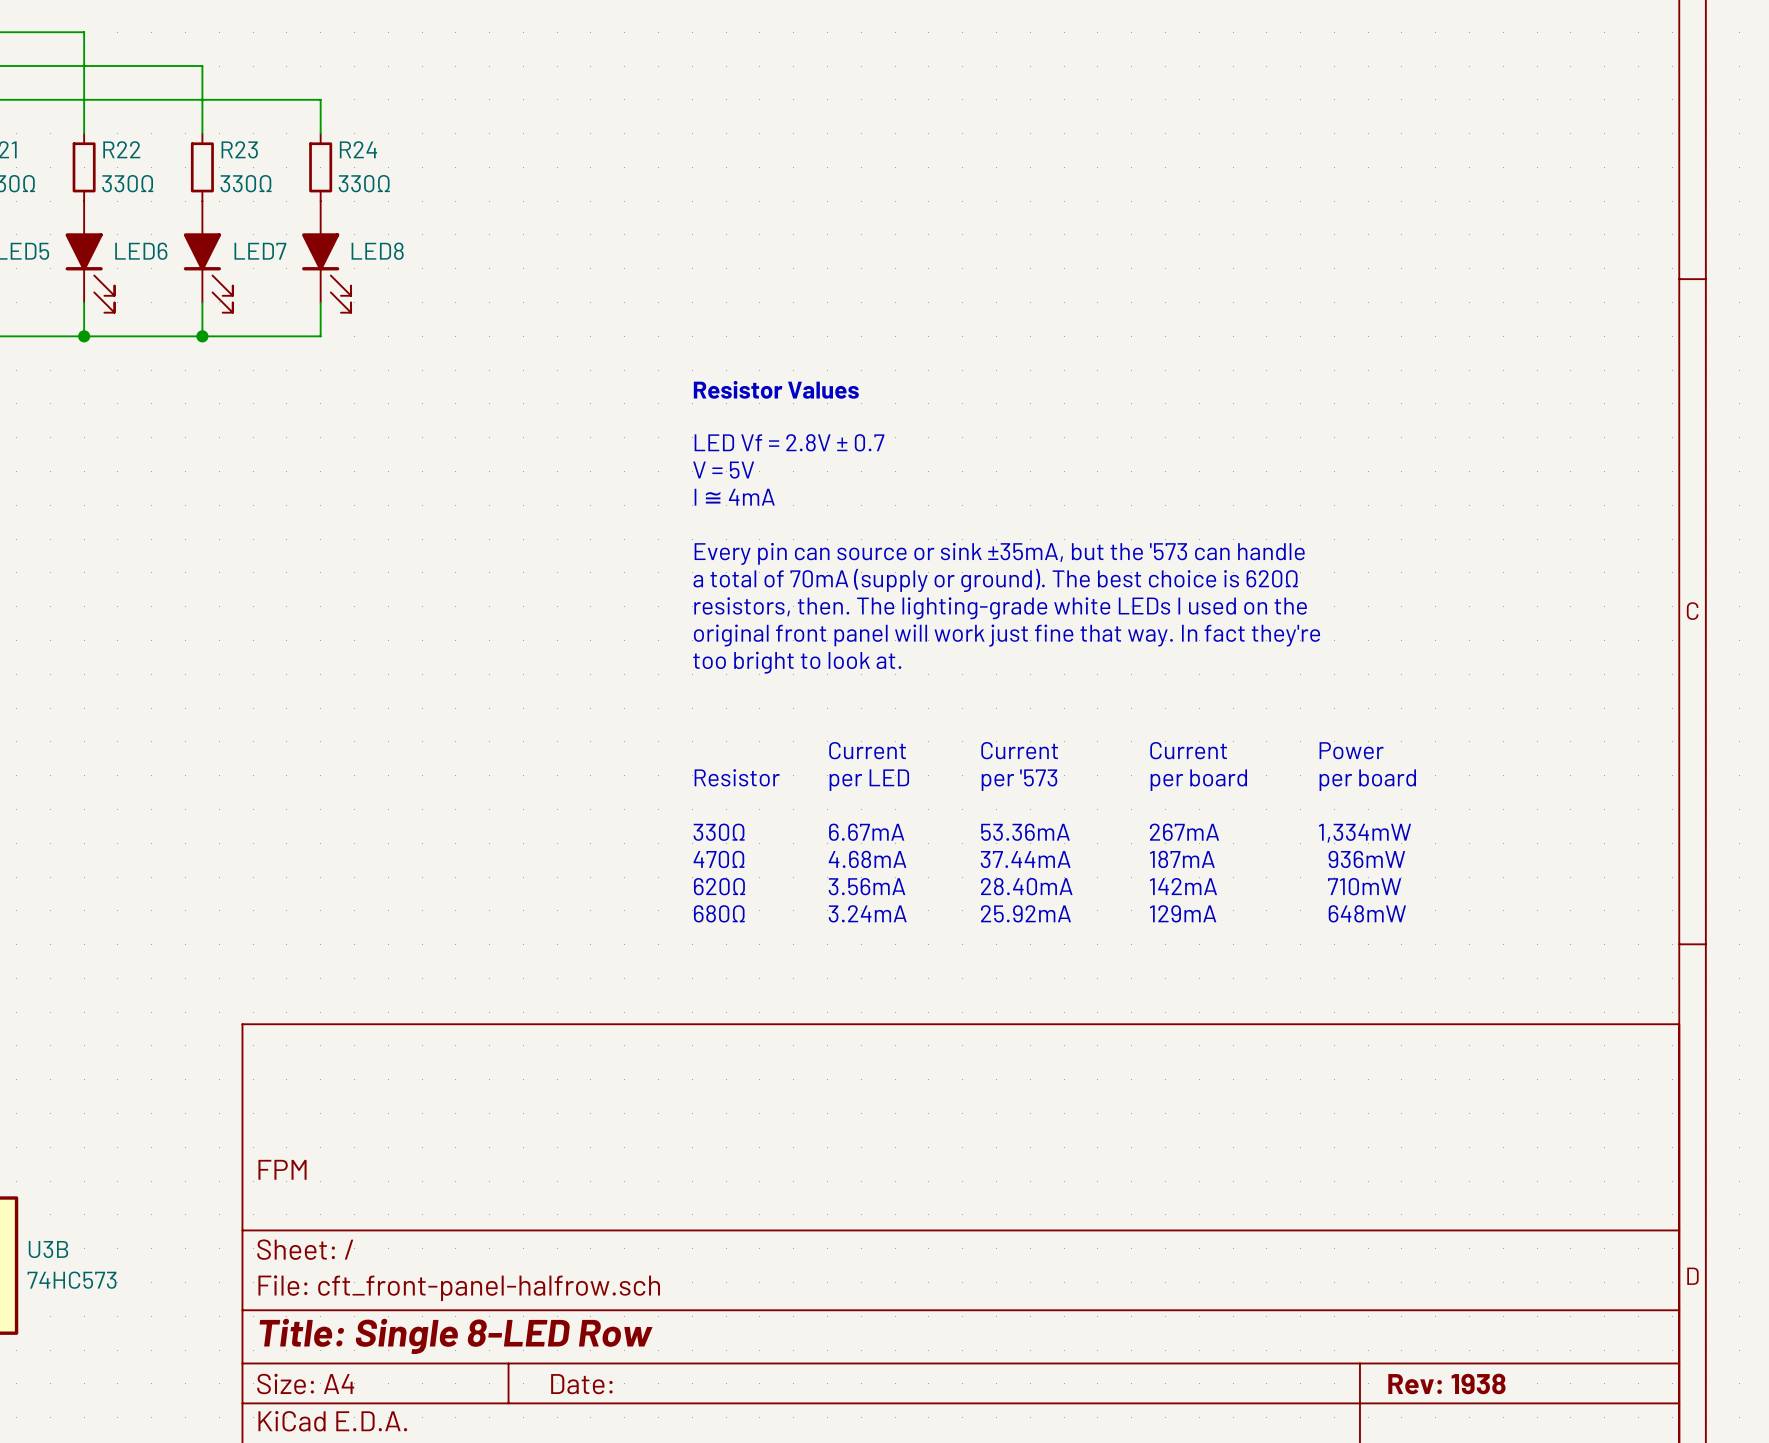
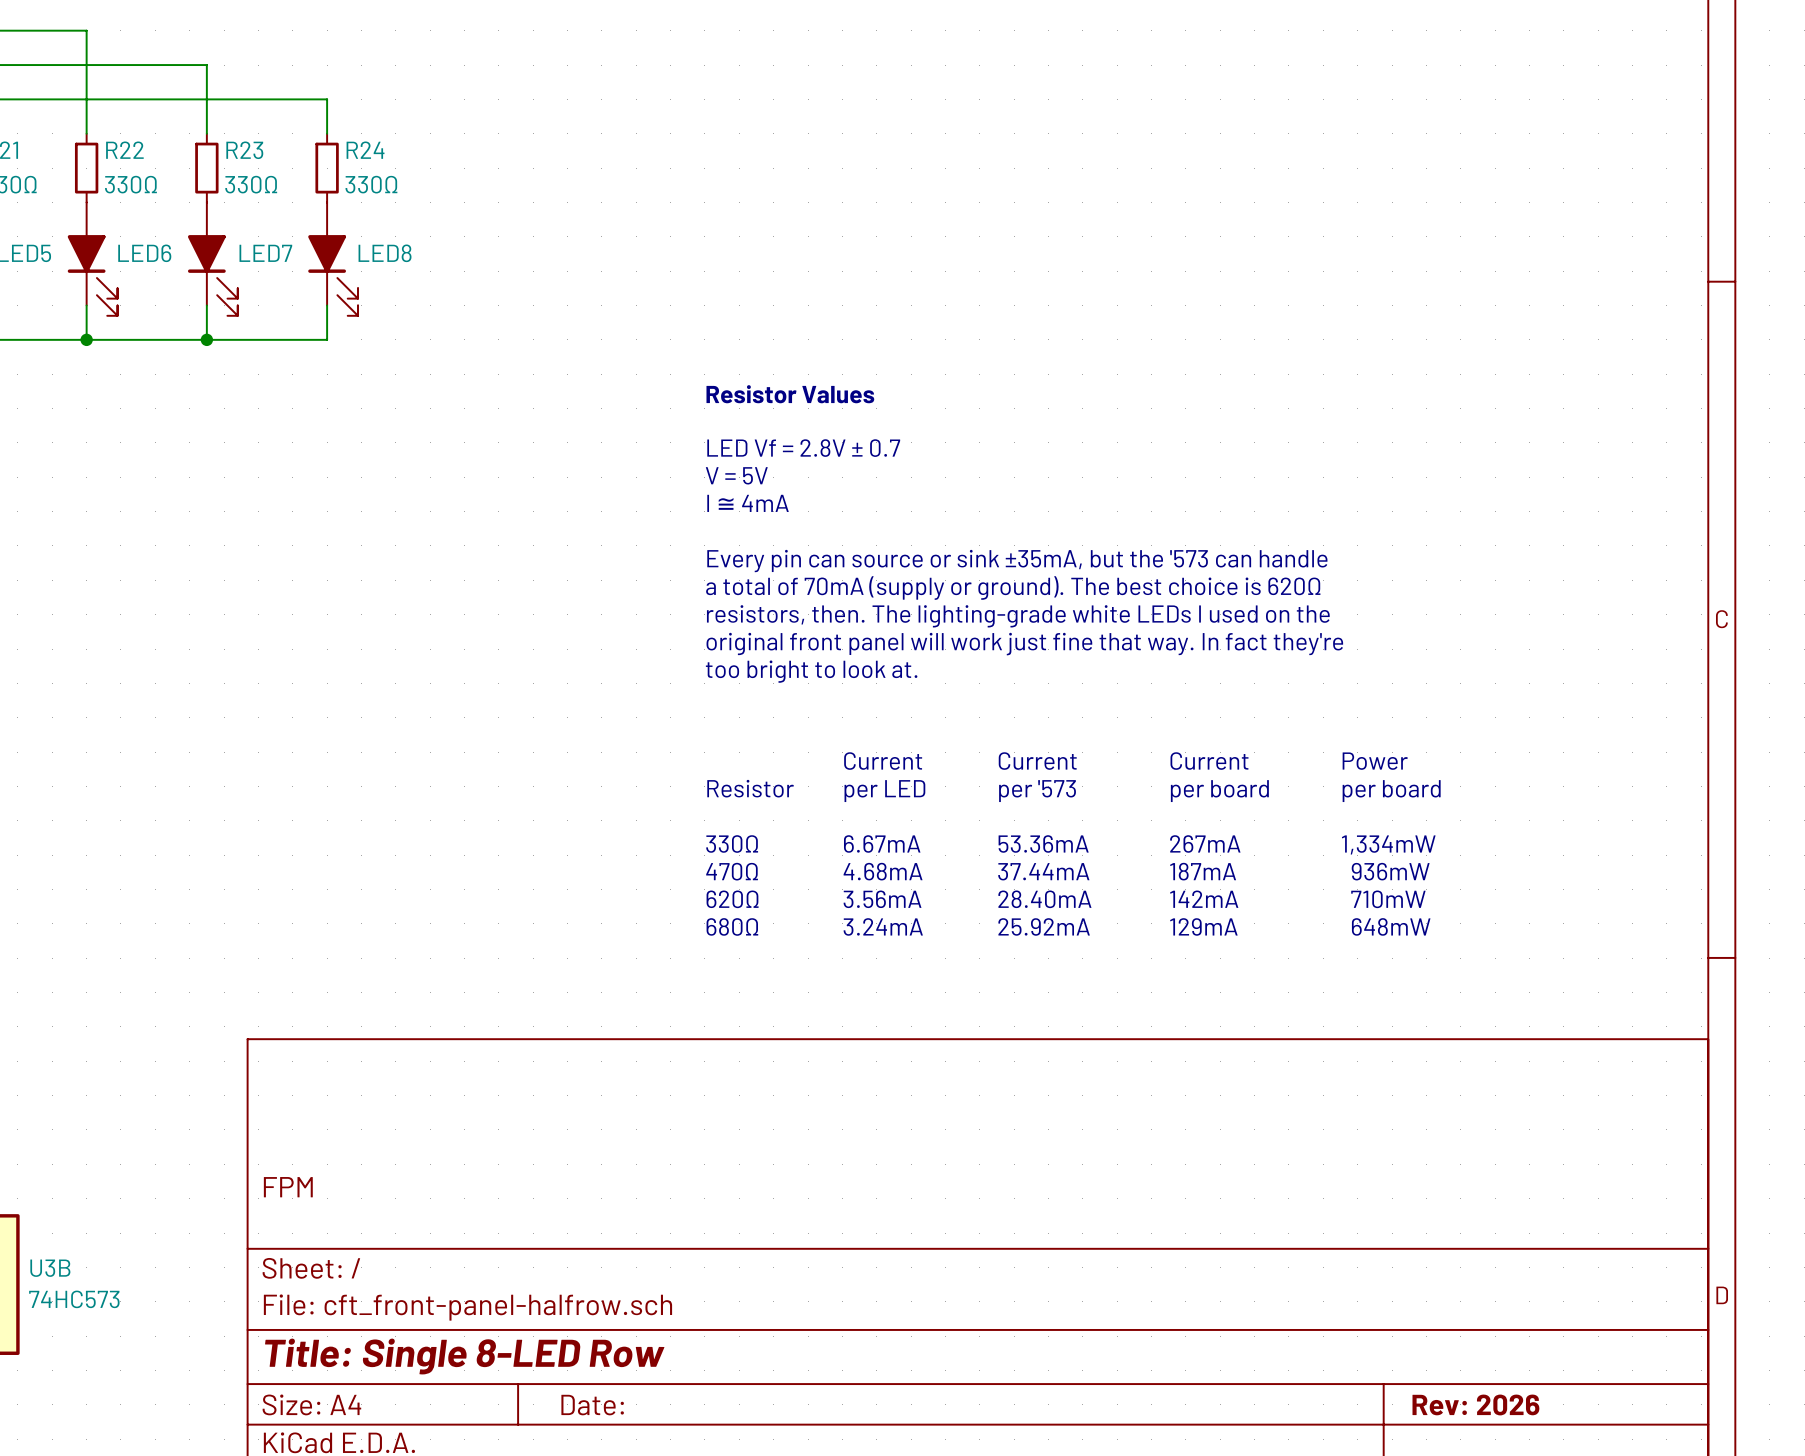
title block: Rev: 1938 (1446, 1383) -> Rev: 2026 (1475, 1404)

